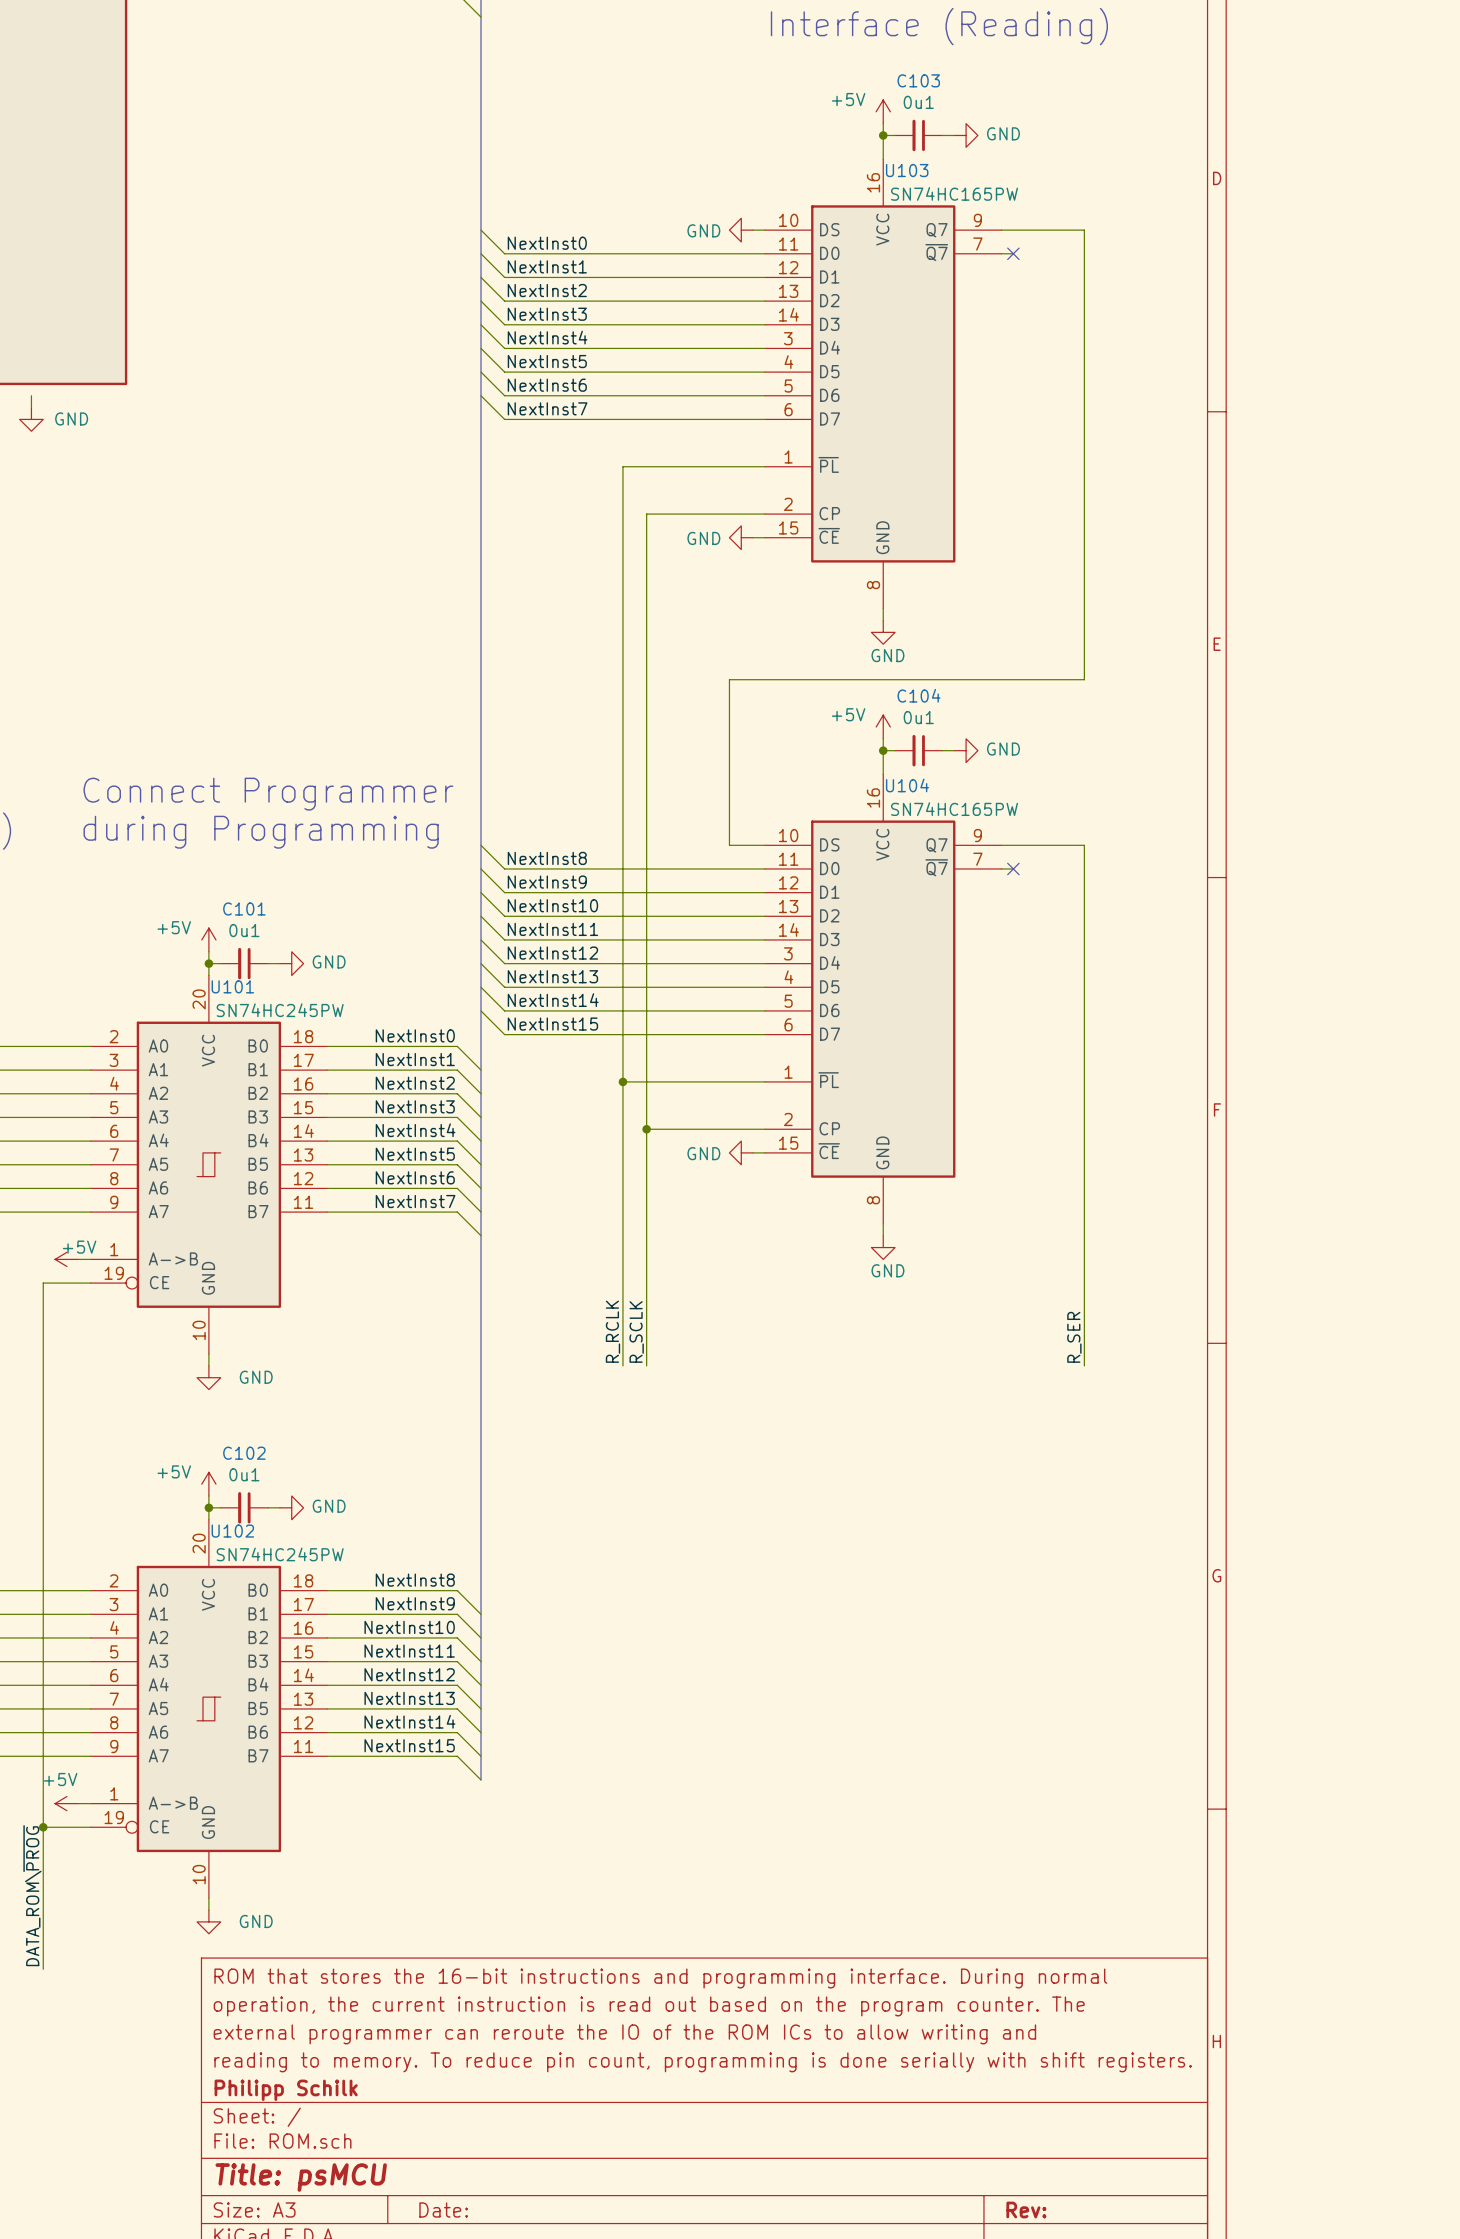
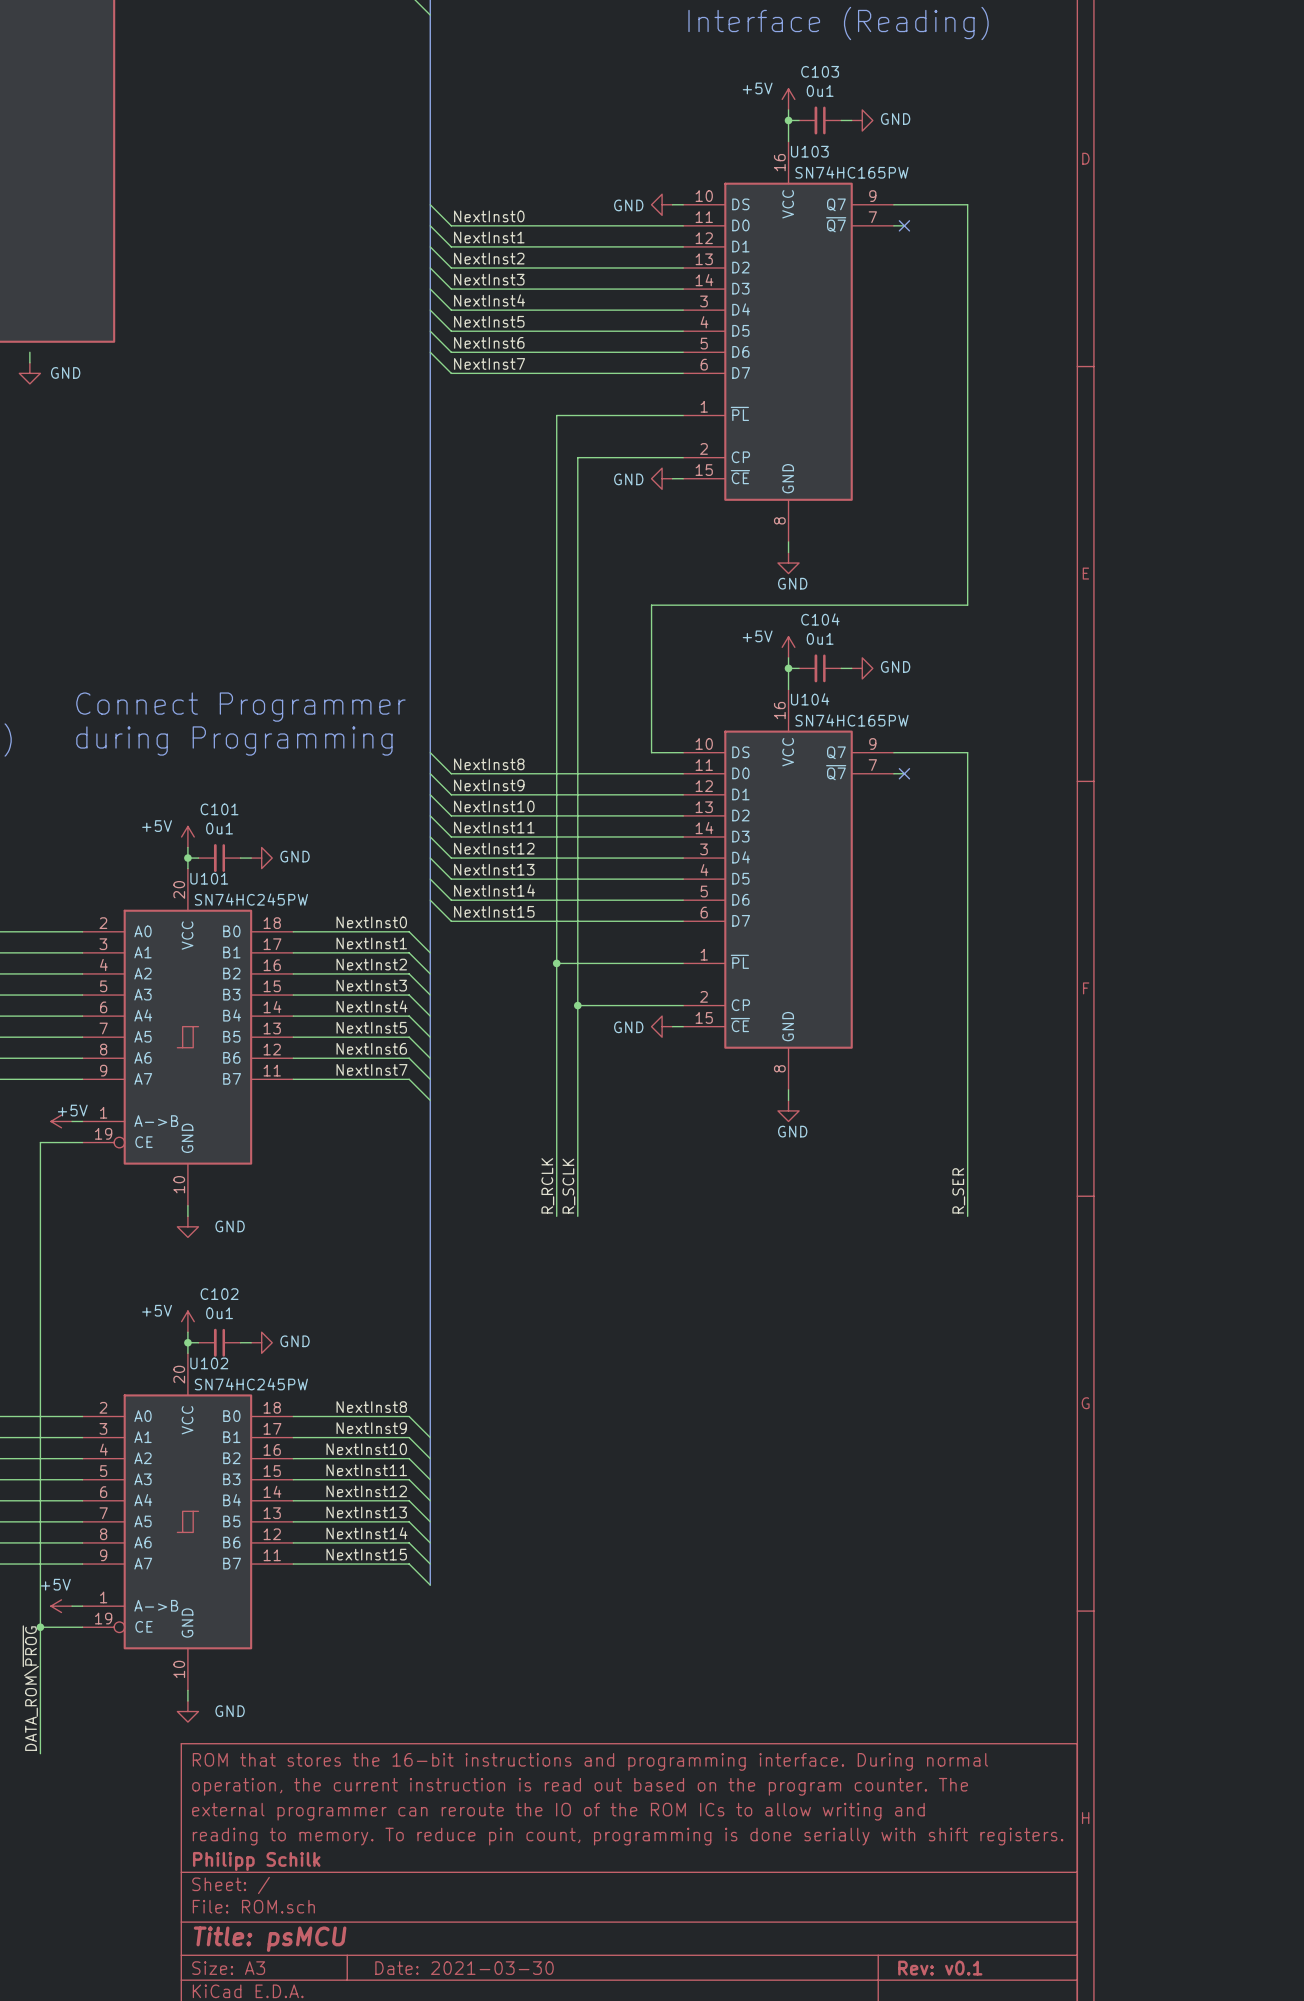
title block: Date: (443, 2209) -> Date: 2021-03-30 (464, 1968)
title block: Rev: (1026, 2209) -> Rev: v0.1 (940, 1968)

